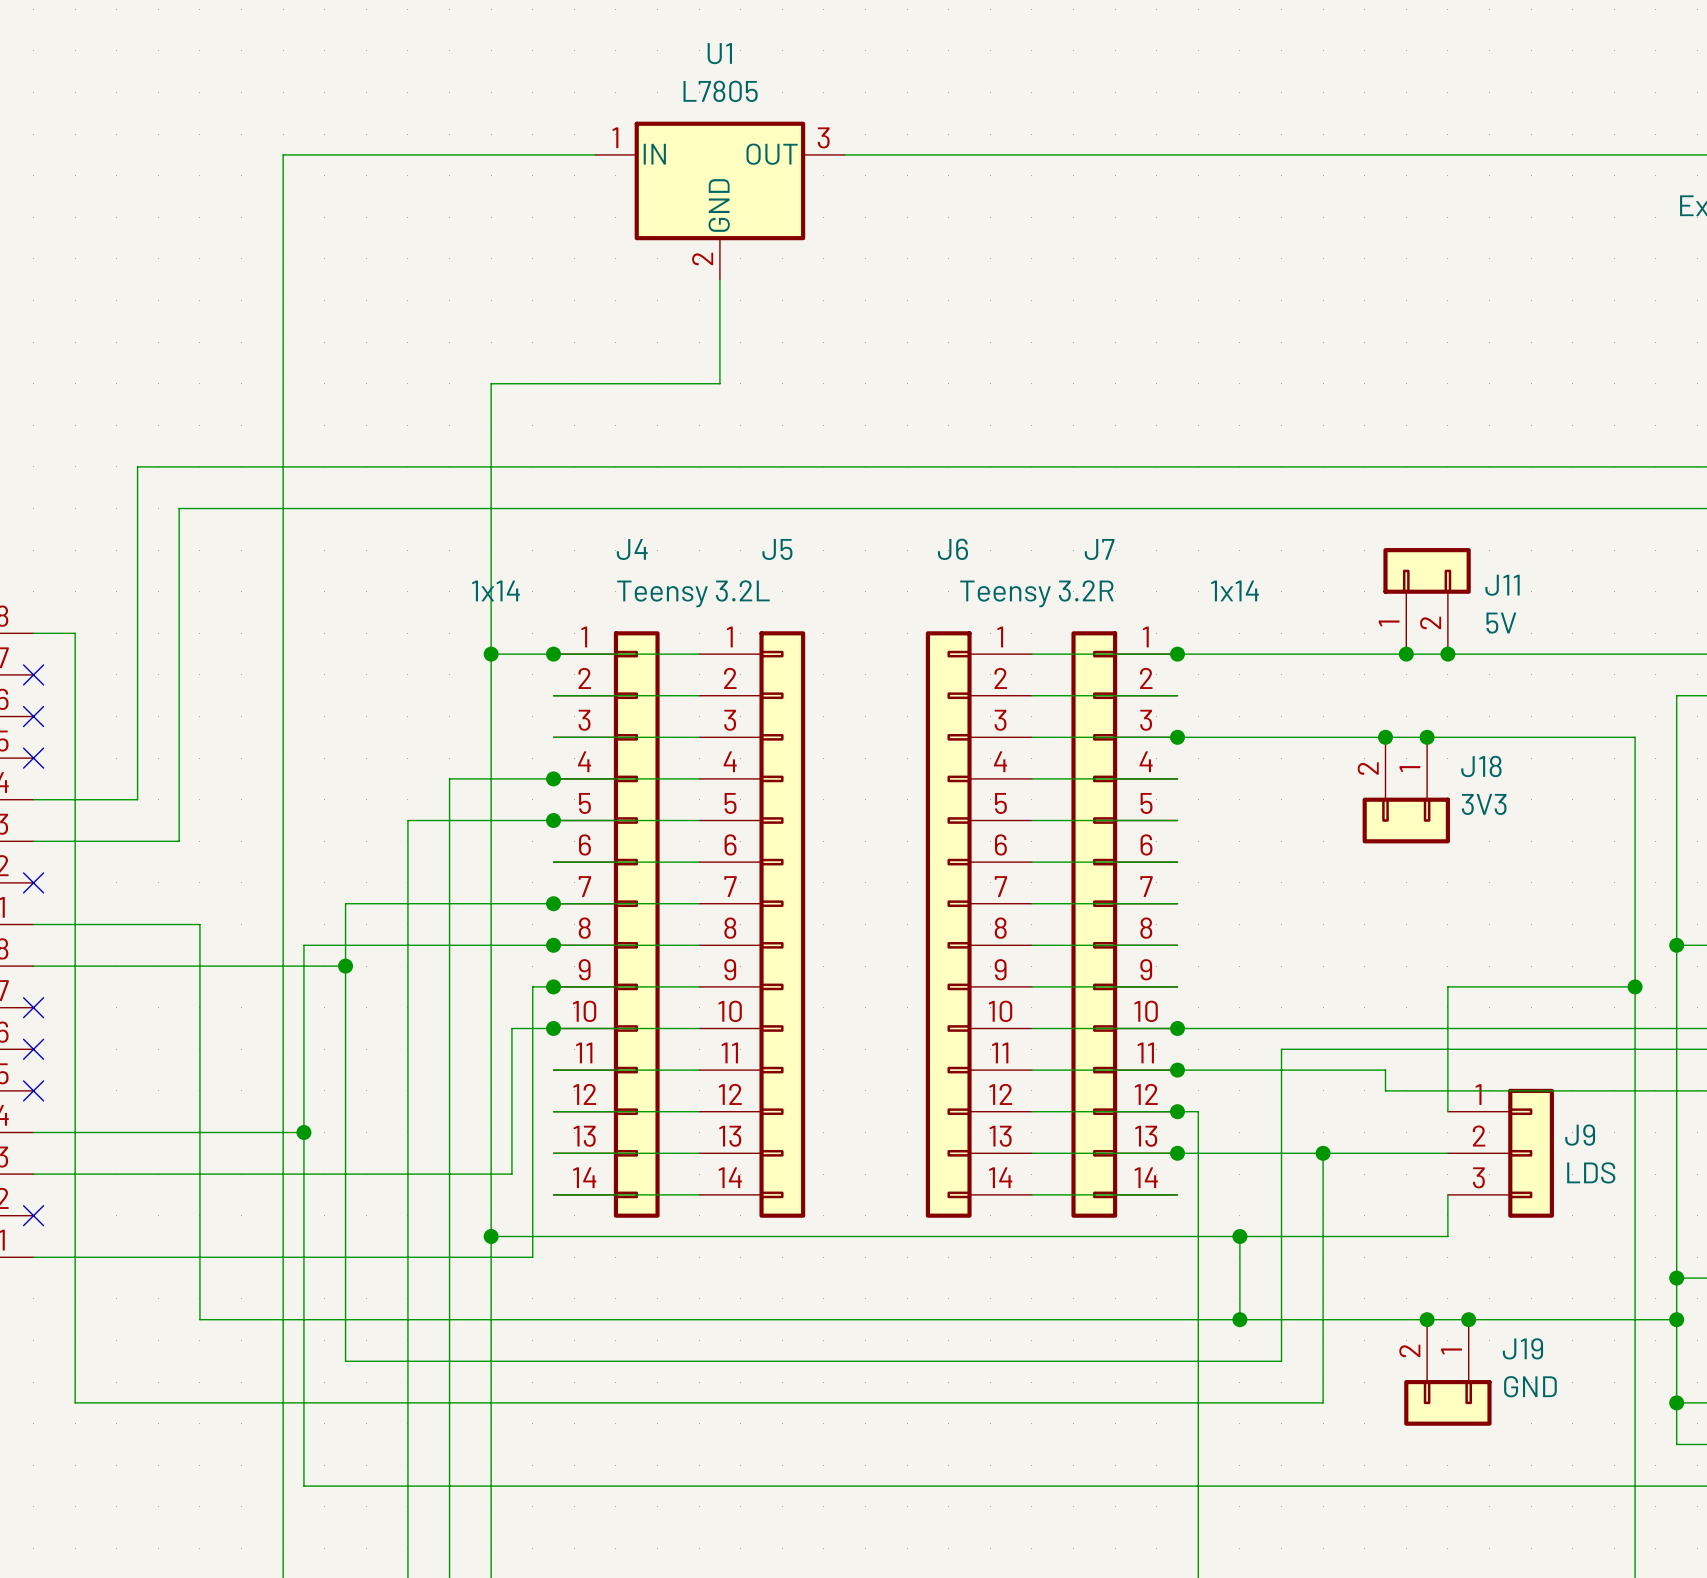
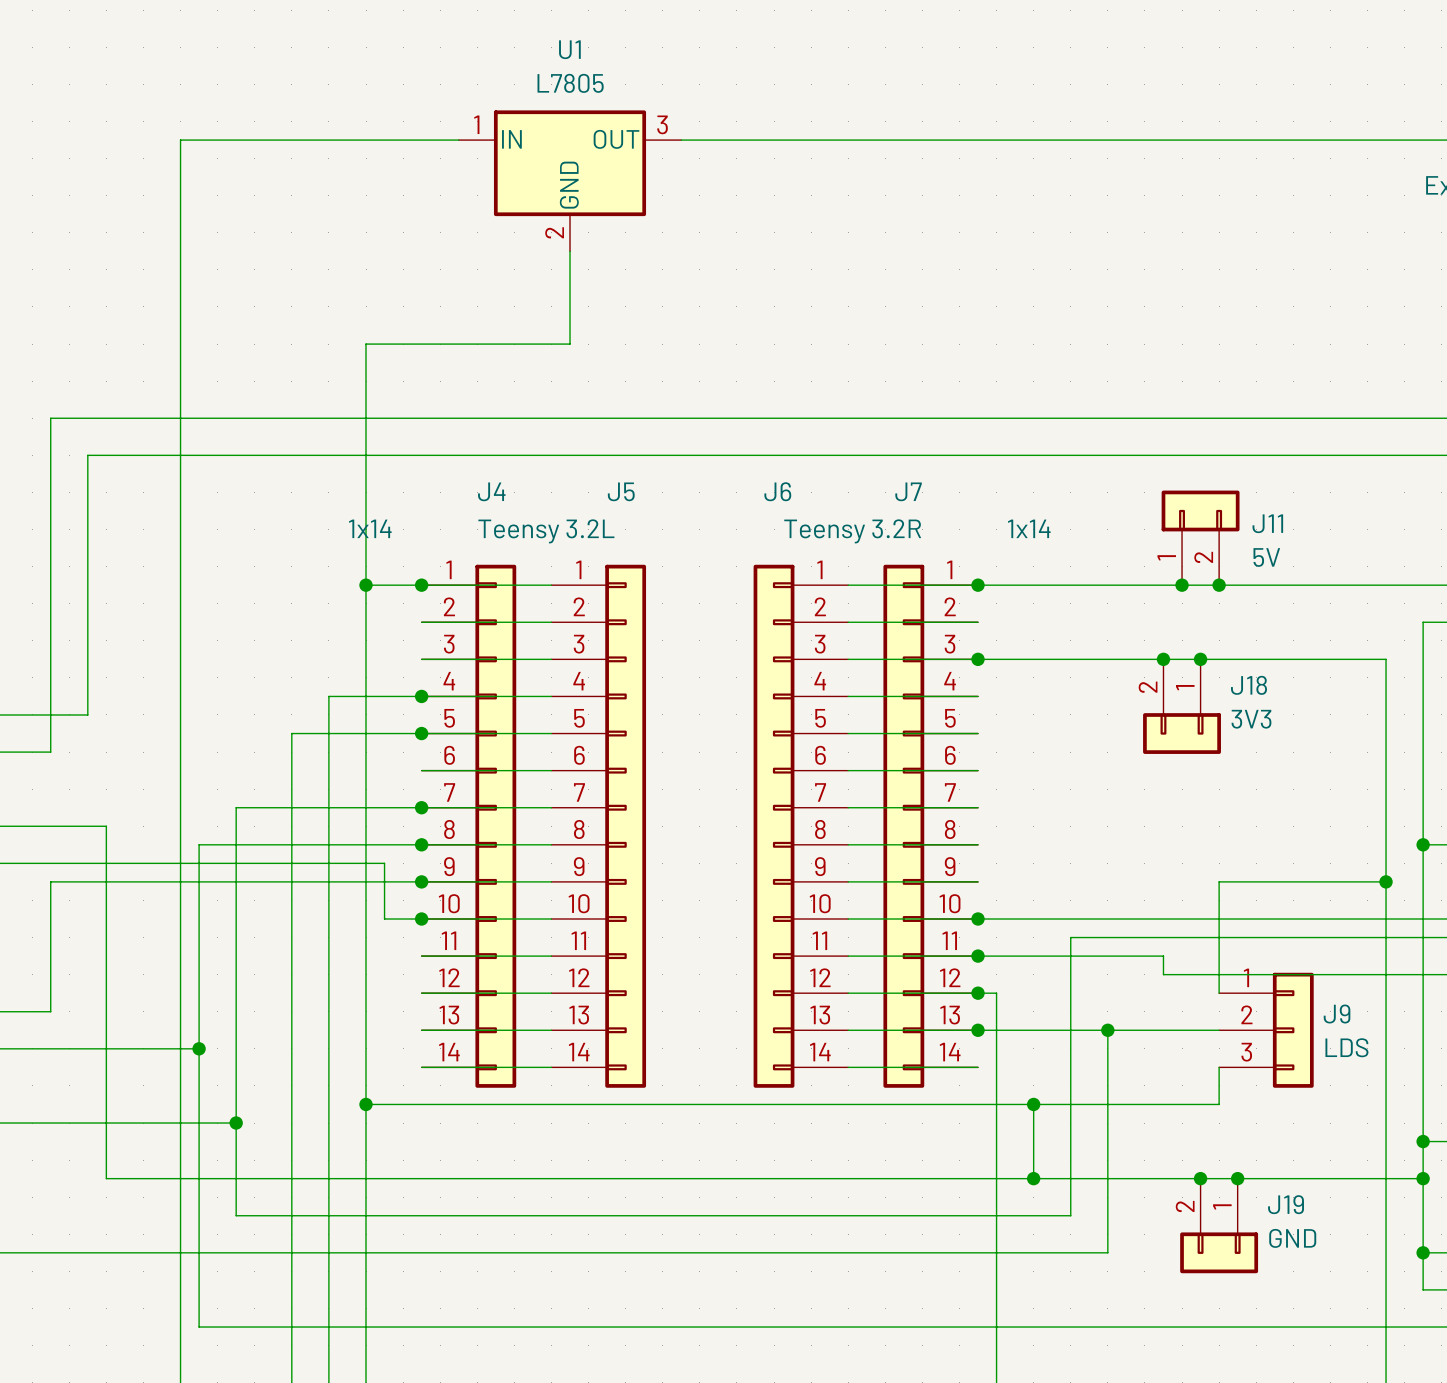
wire: (179, 799) (179, 841) (137, 841) -> (87, 714) (50, 714) (50, 752)
junction: (345, 966) -> none
wire: (532, 986) (532, 1257) (345, 1257) -> (403, 881) (50, 881) (50, 1011)
wire: (511, 1028) (511, 1174) (303, 1174) -> (384, 919) (384, 863) (236, 863)
wire: (137, 1132) (303, 1132) -> none
junction position: (303, 1132) -> (199, 1048)
junction: none -> (236, 1123)

